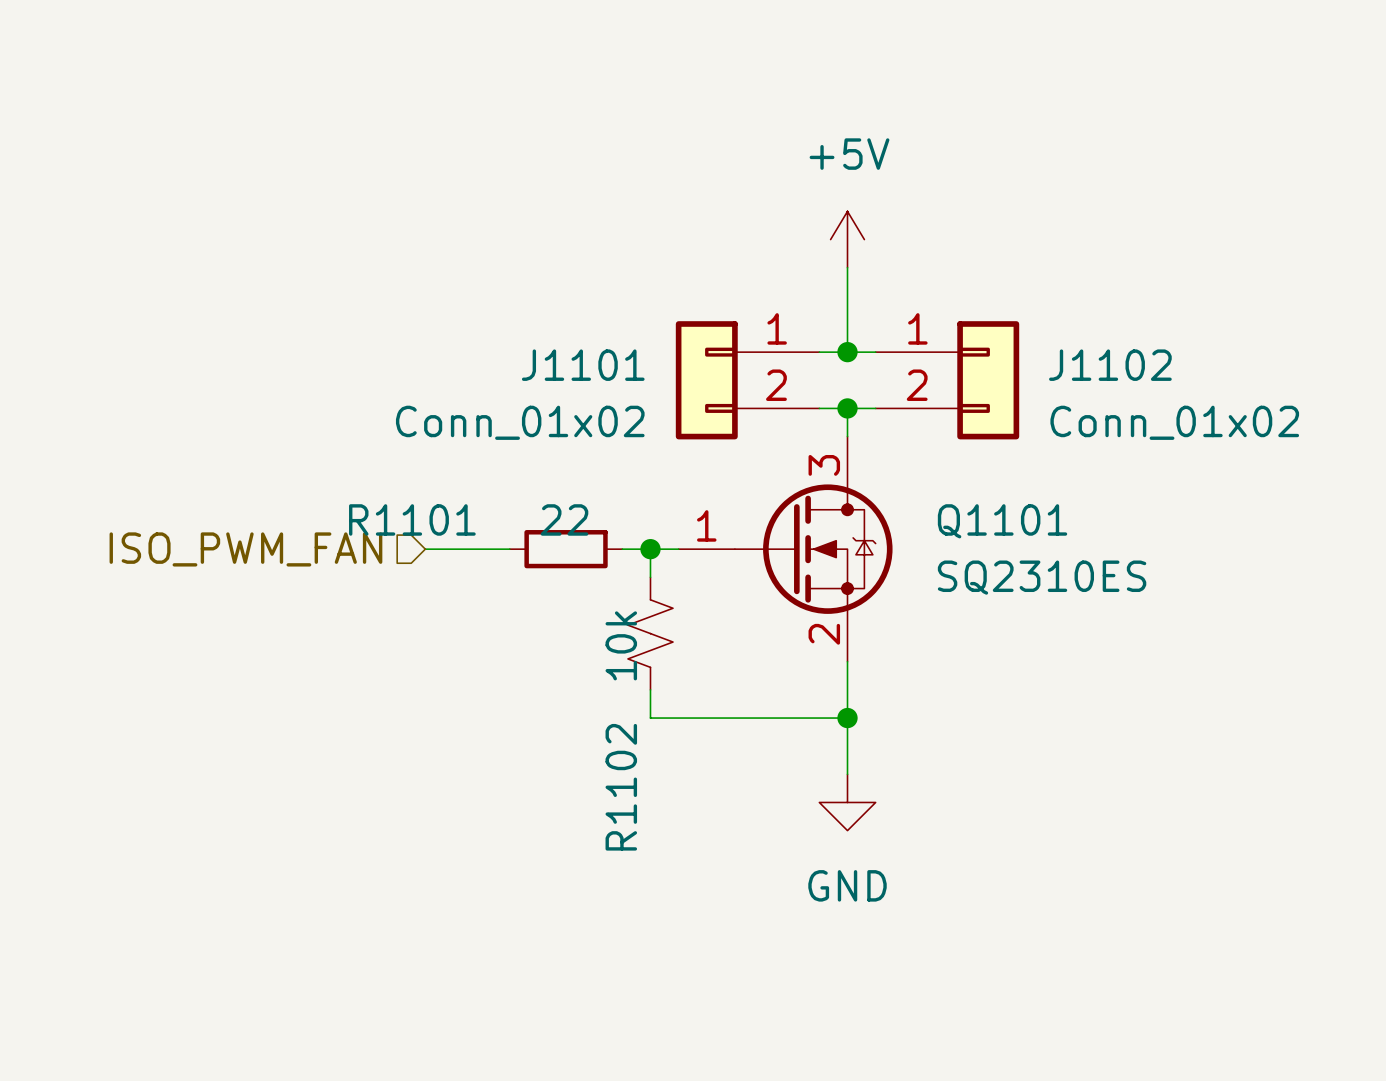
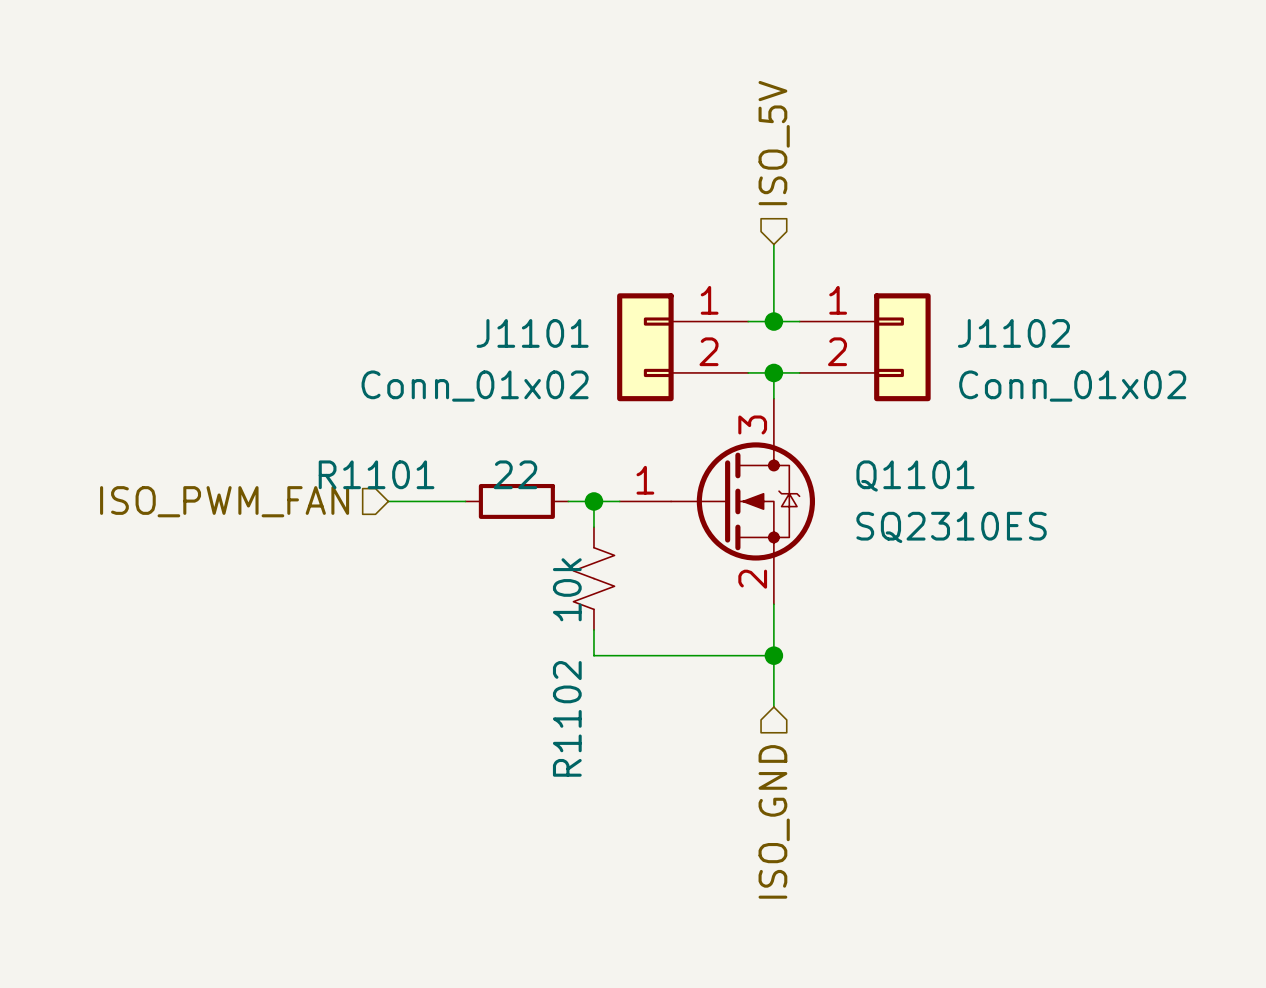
hierarchical label: none -> ISO_5V (774, 143)
power symbol: +5V (847, 239) -> none
power symbol: GND (847, 802) -> none
hierarchical label: none -> ISO_GND (774, 821)

